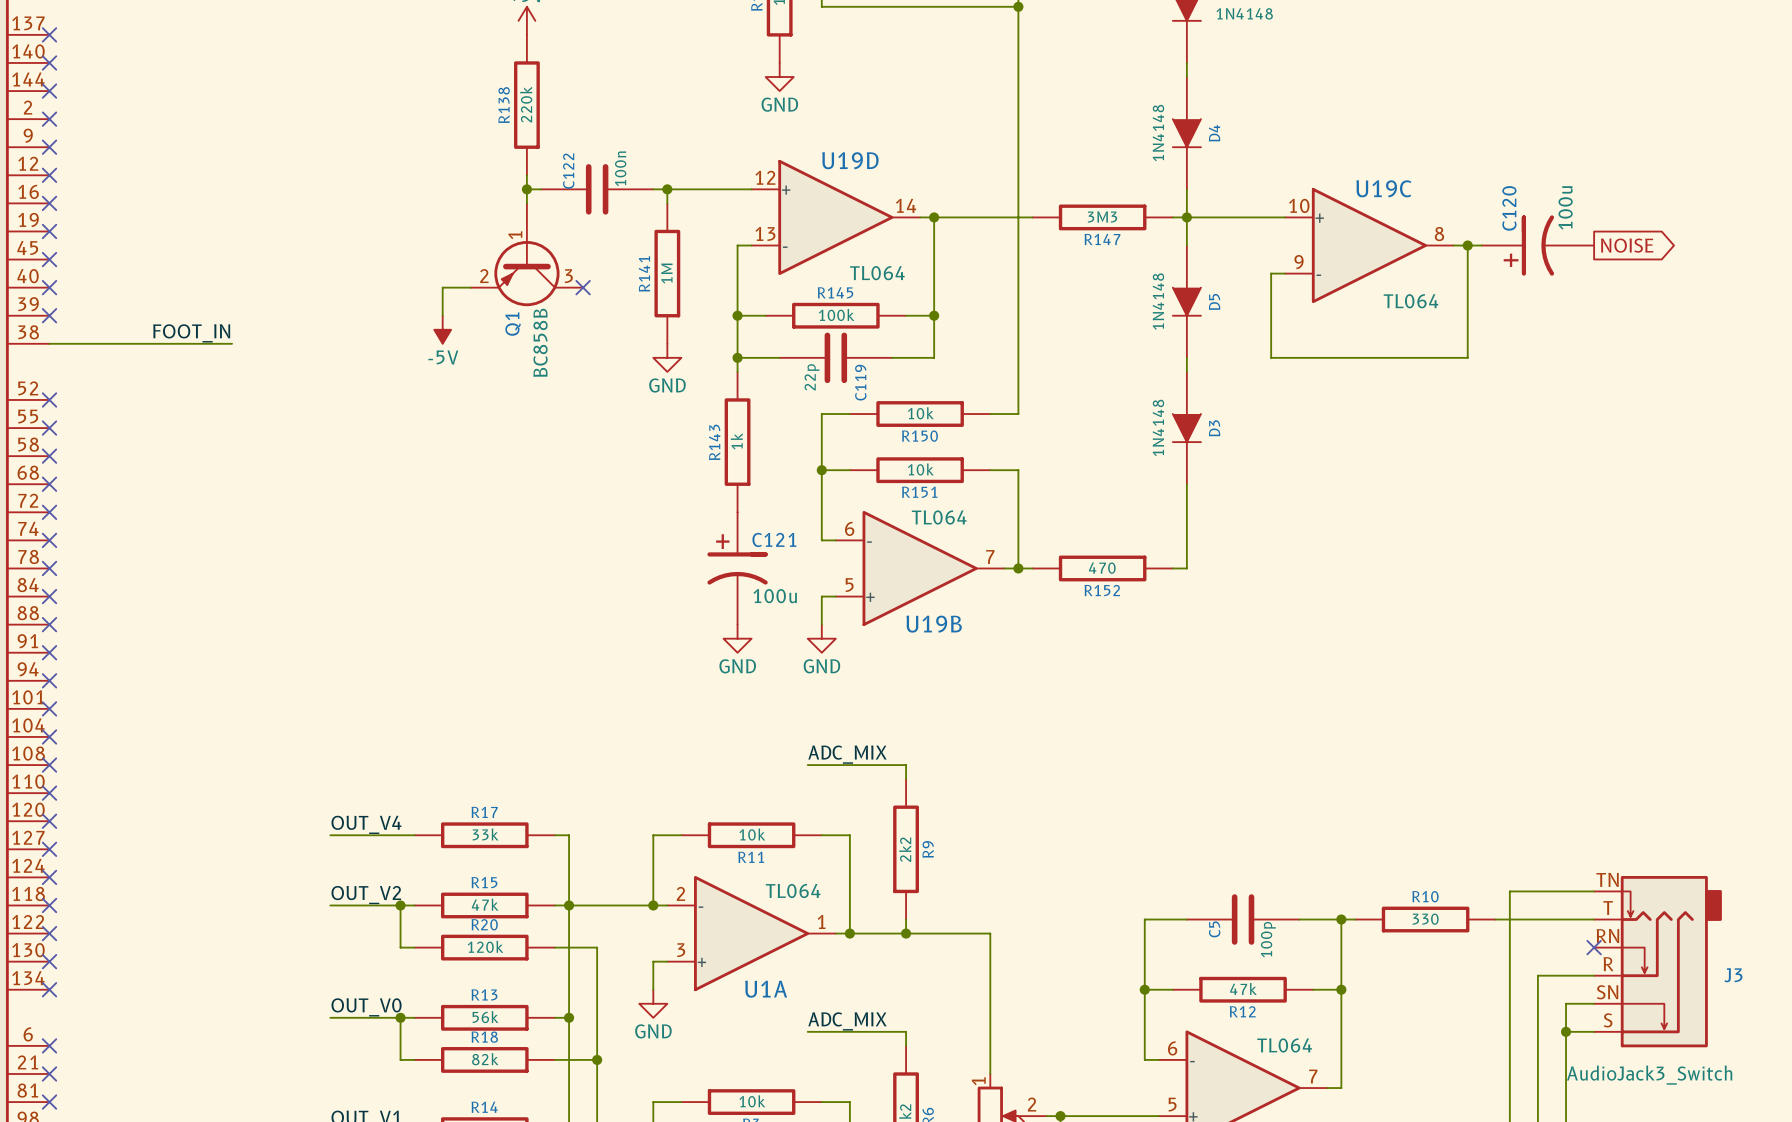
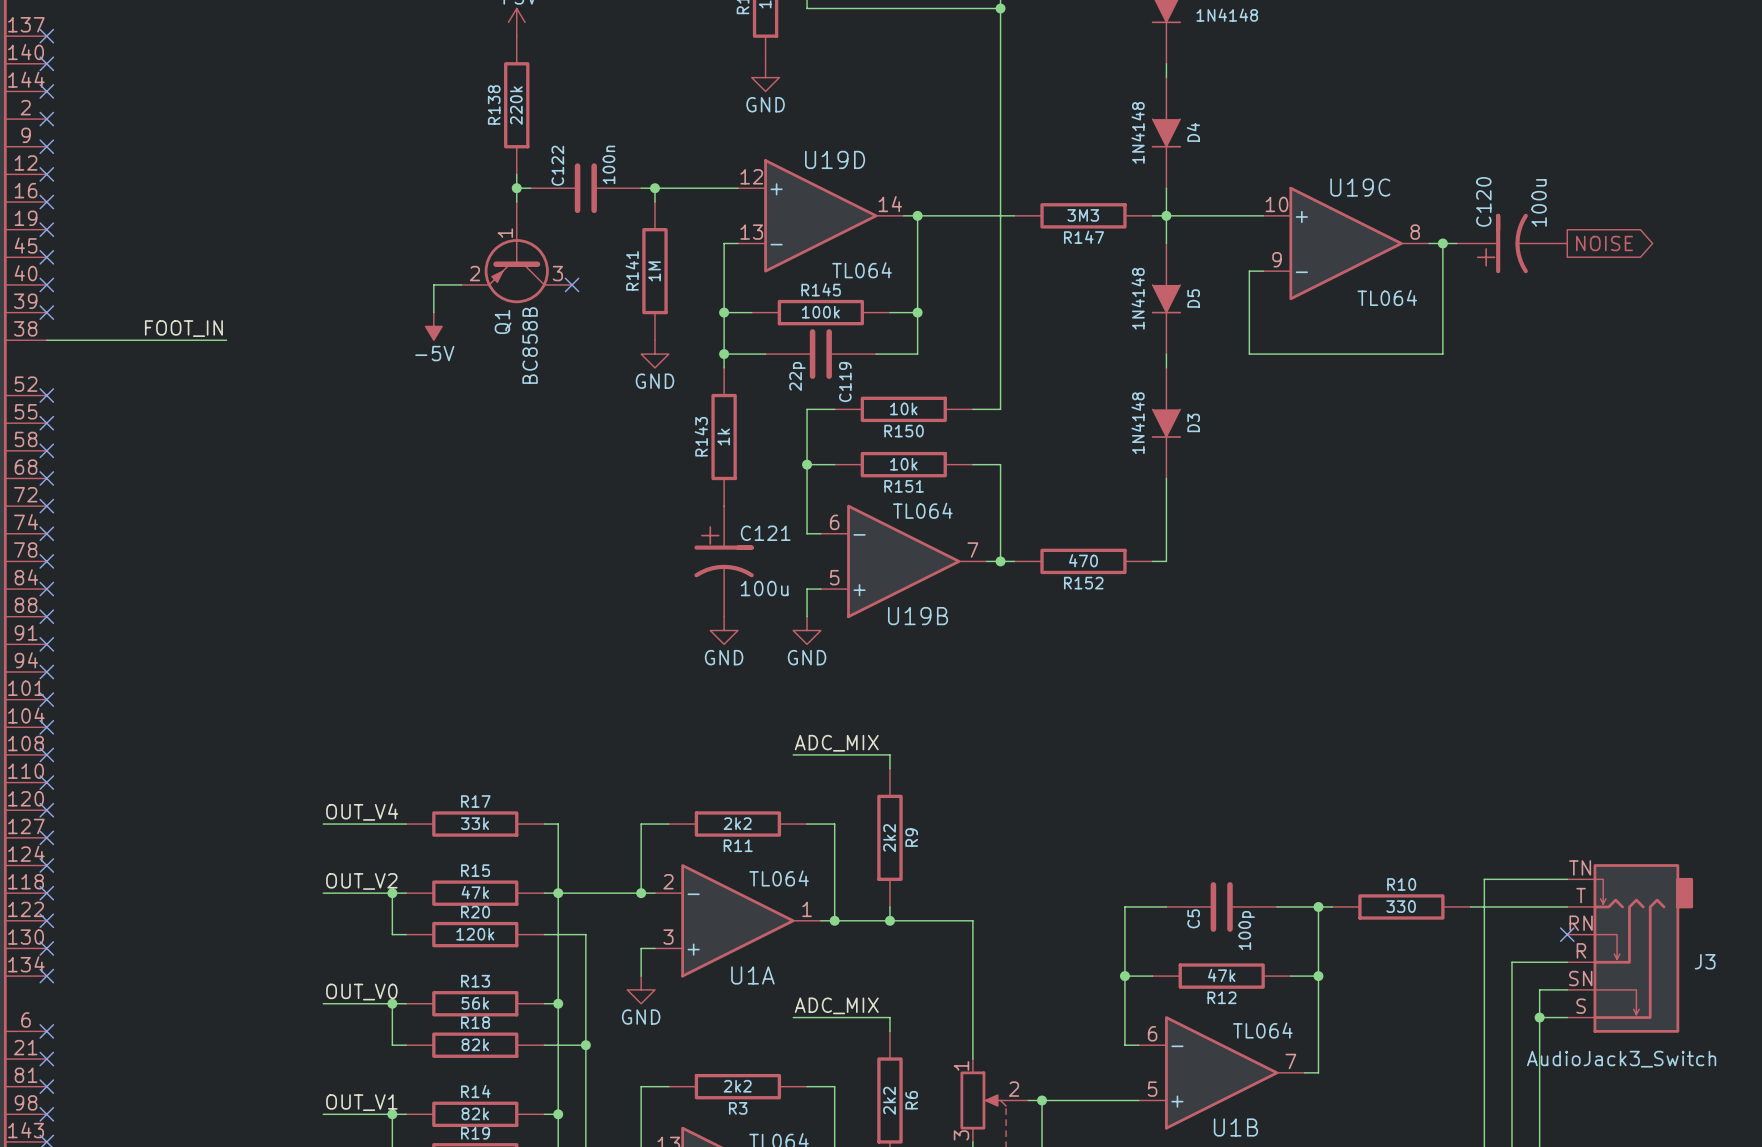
R11 value: 10k (752, 834) -> 2k2 (737, 823)
R3 value: 10k (752, 1101) -> 2k2 (737, 1086)

